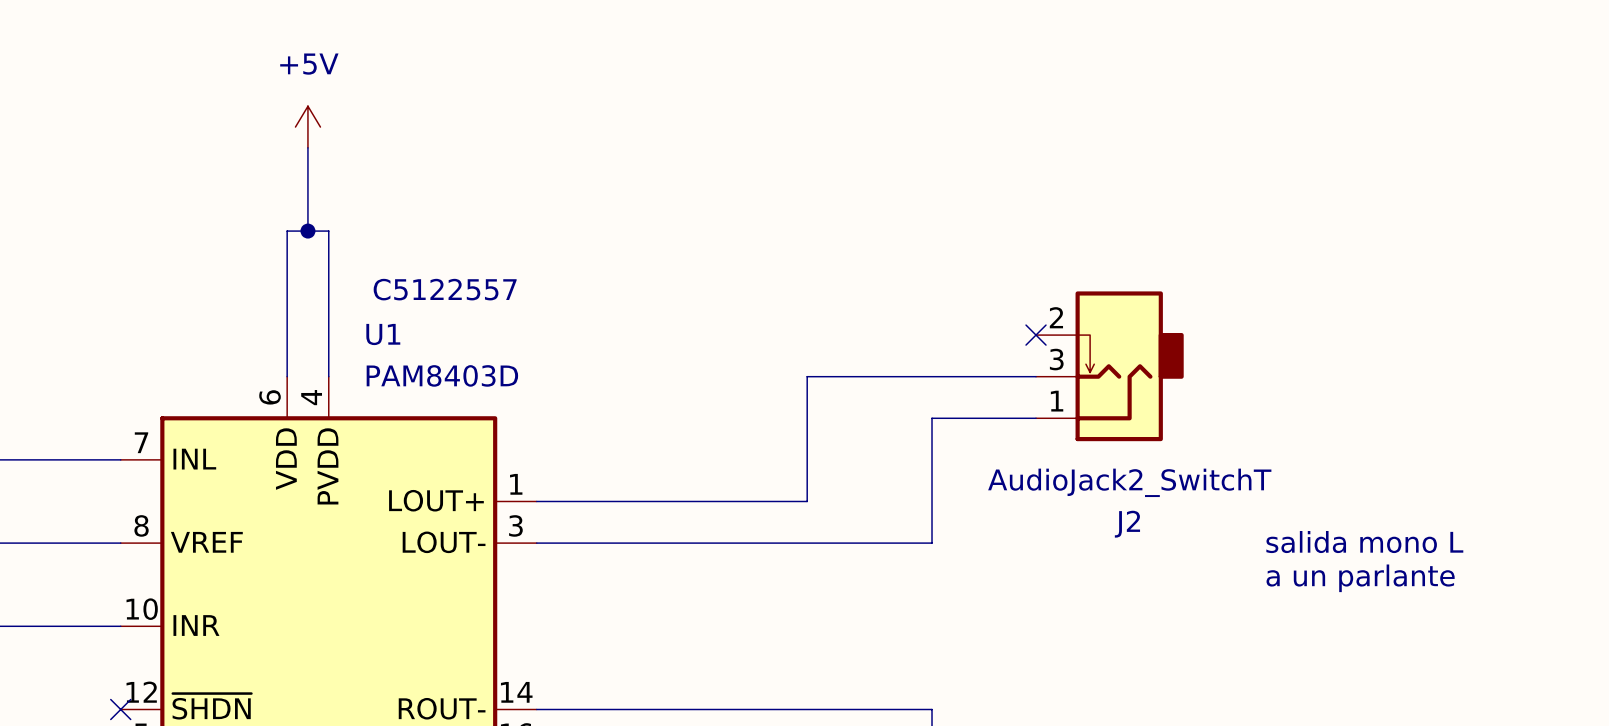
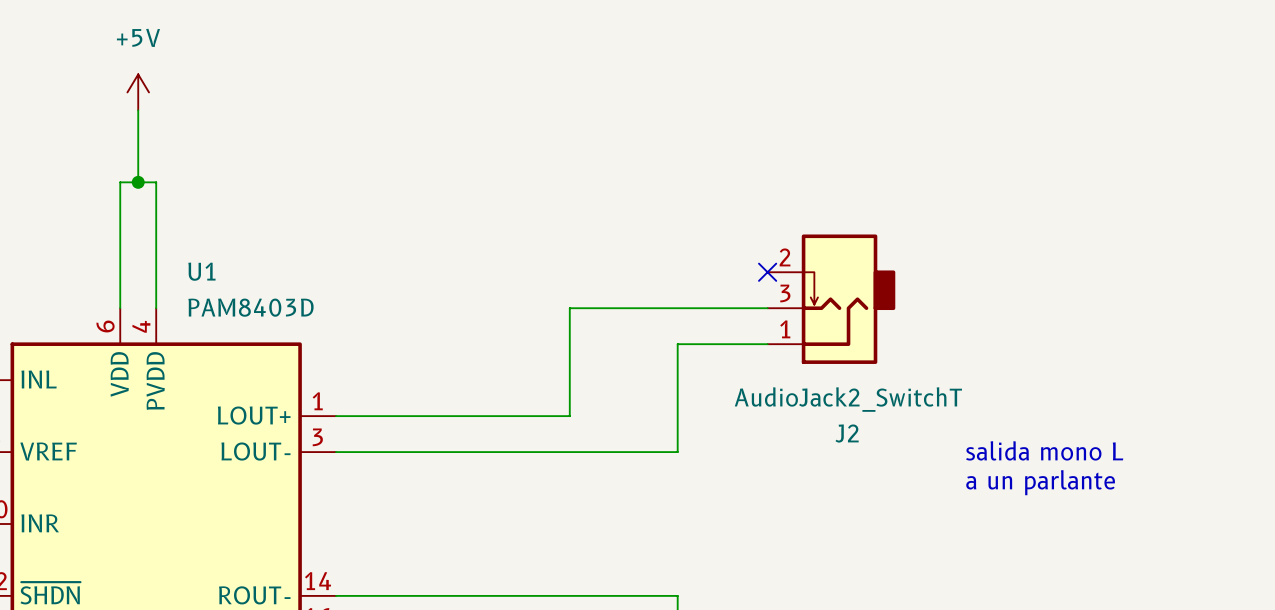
U1 text: C5122557 (445, 289) -> none

